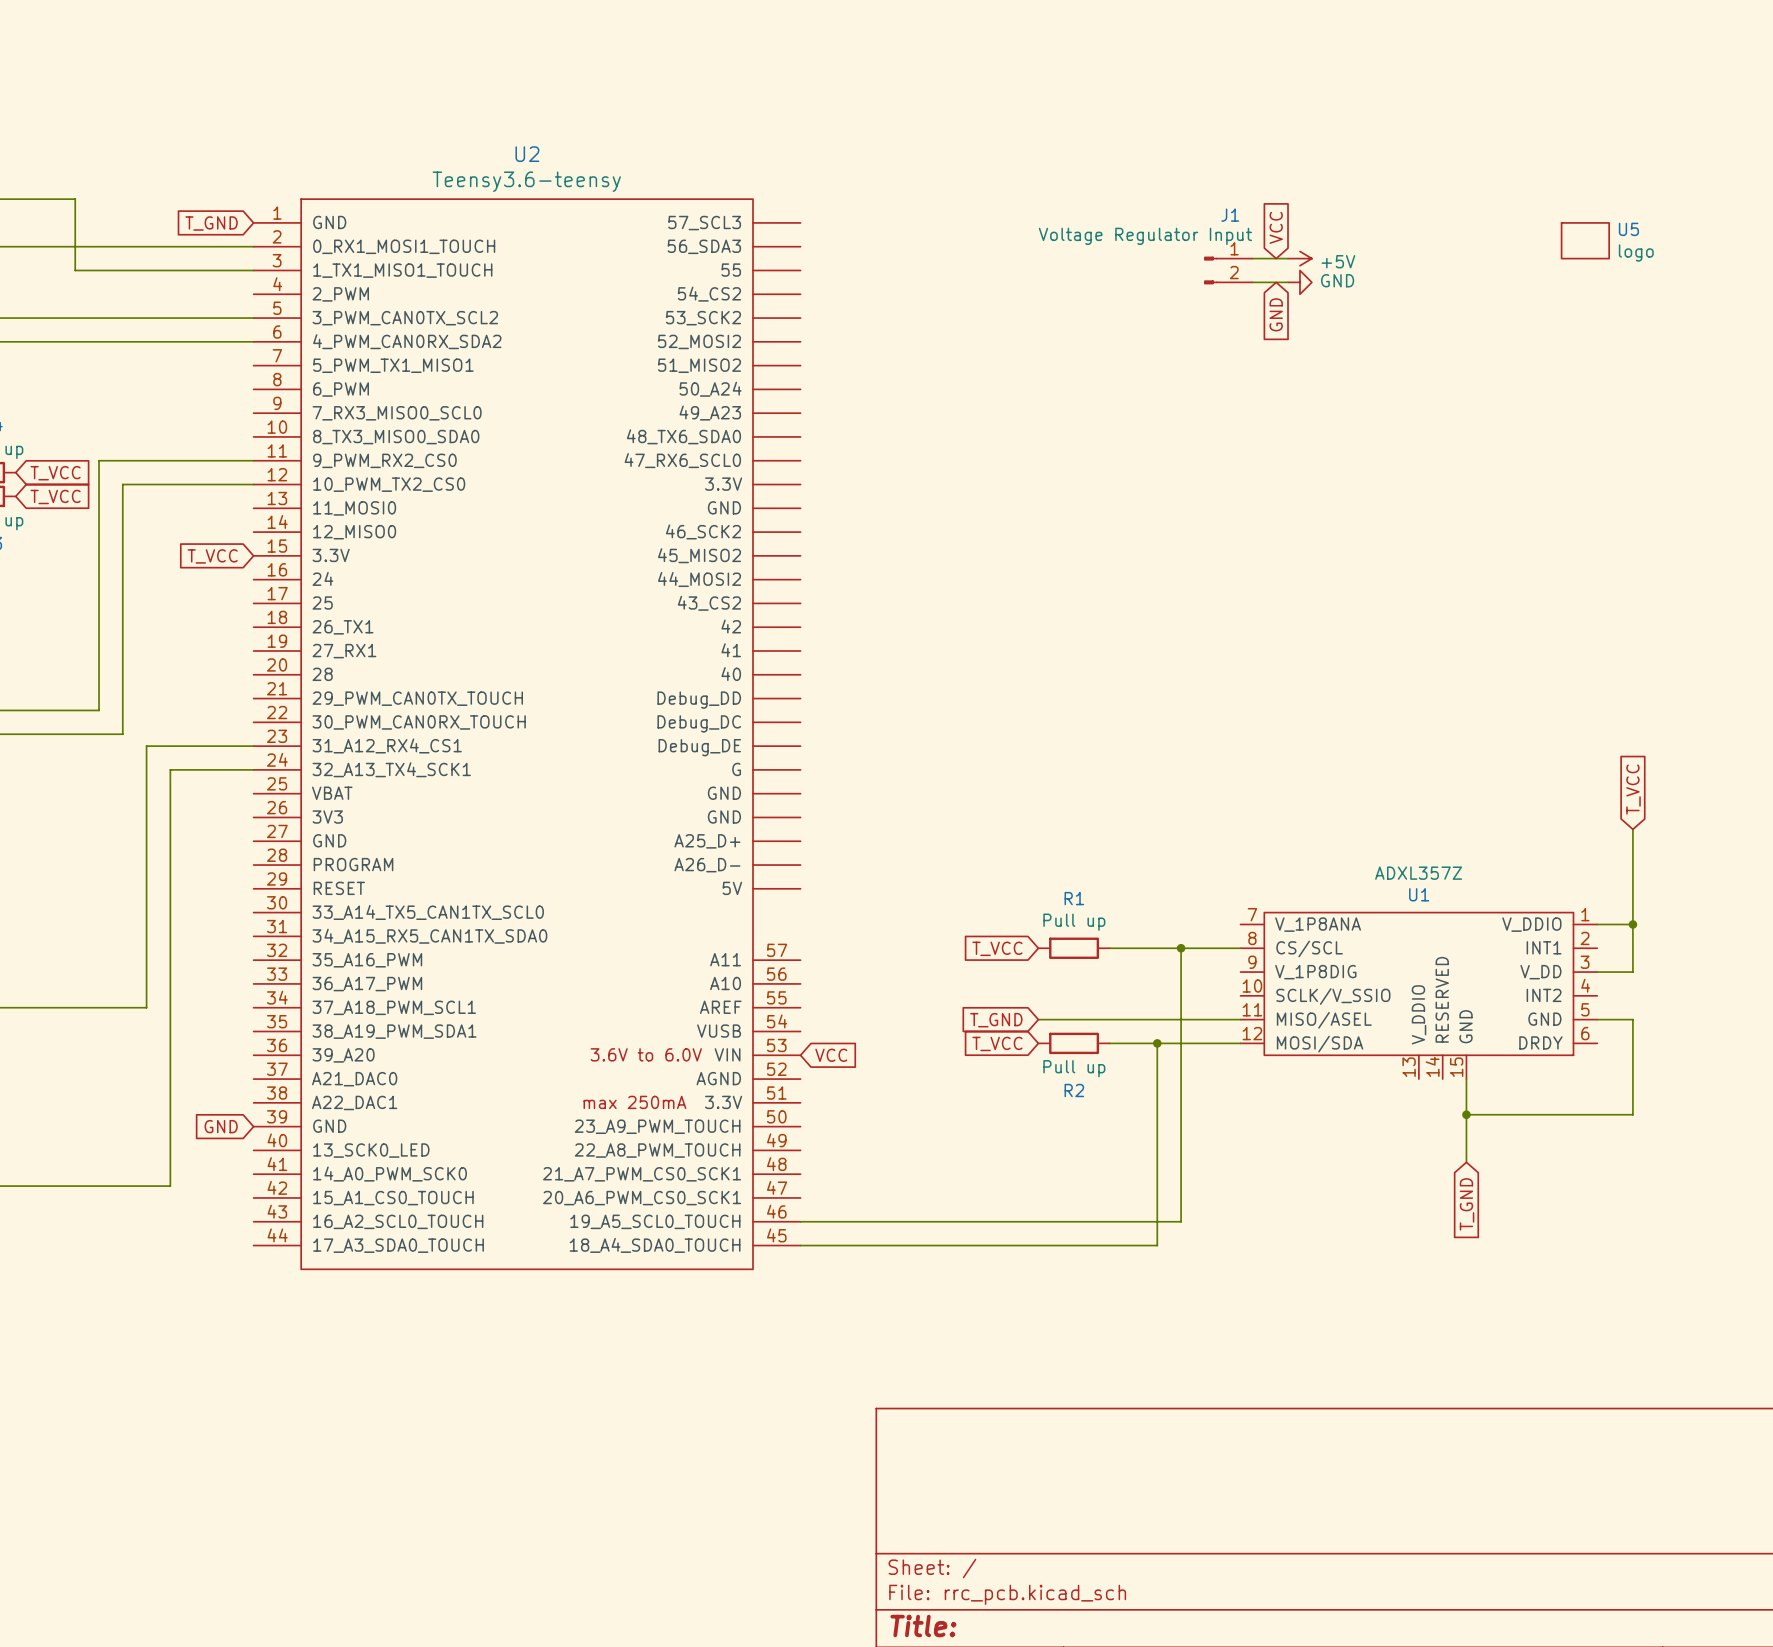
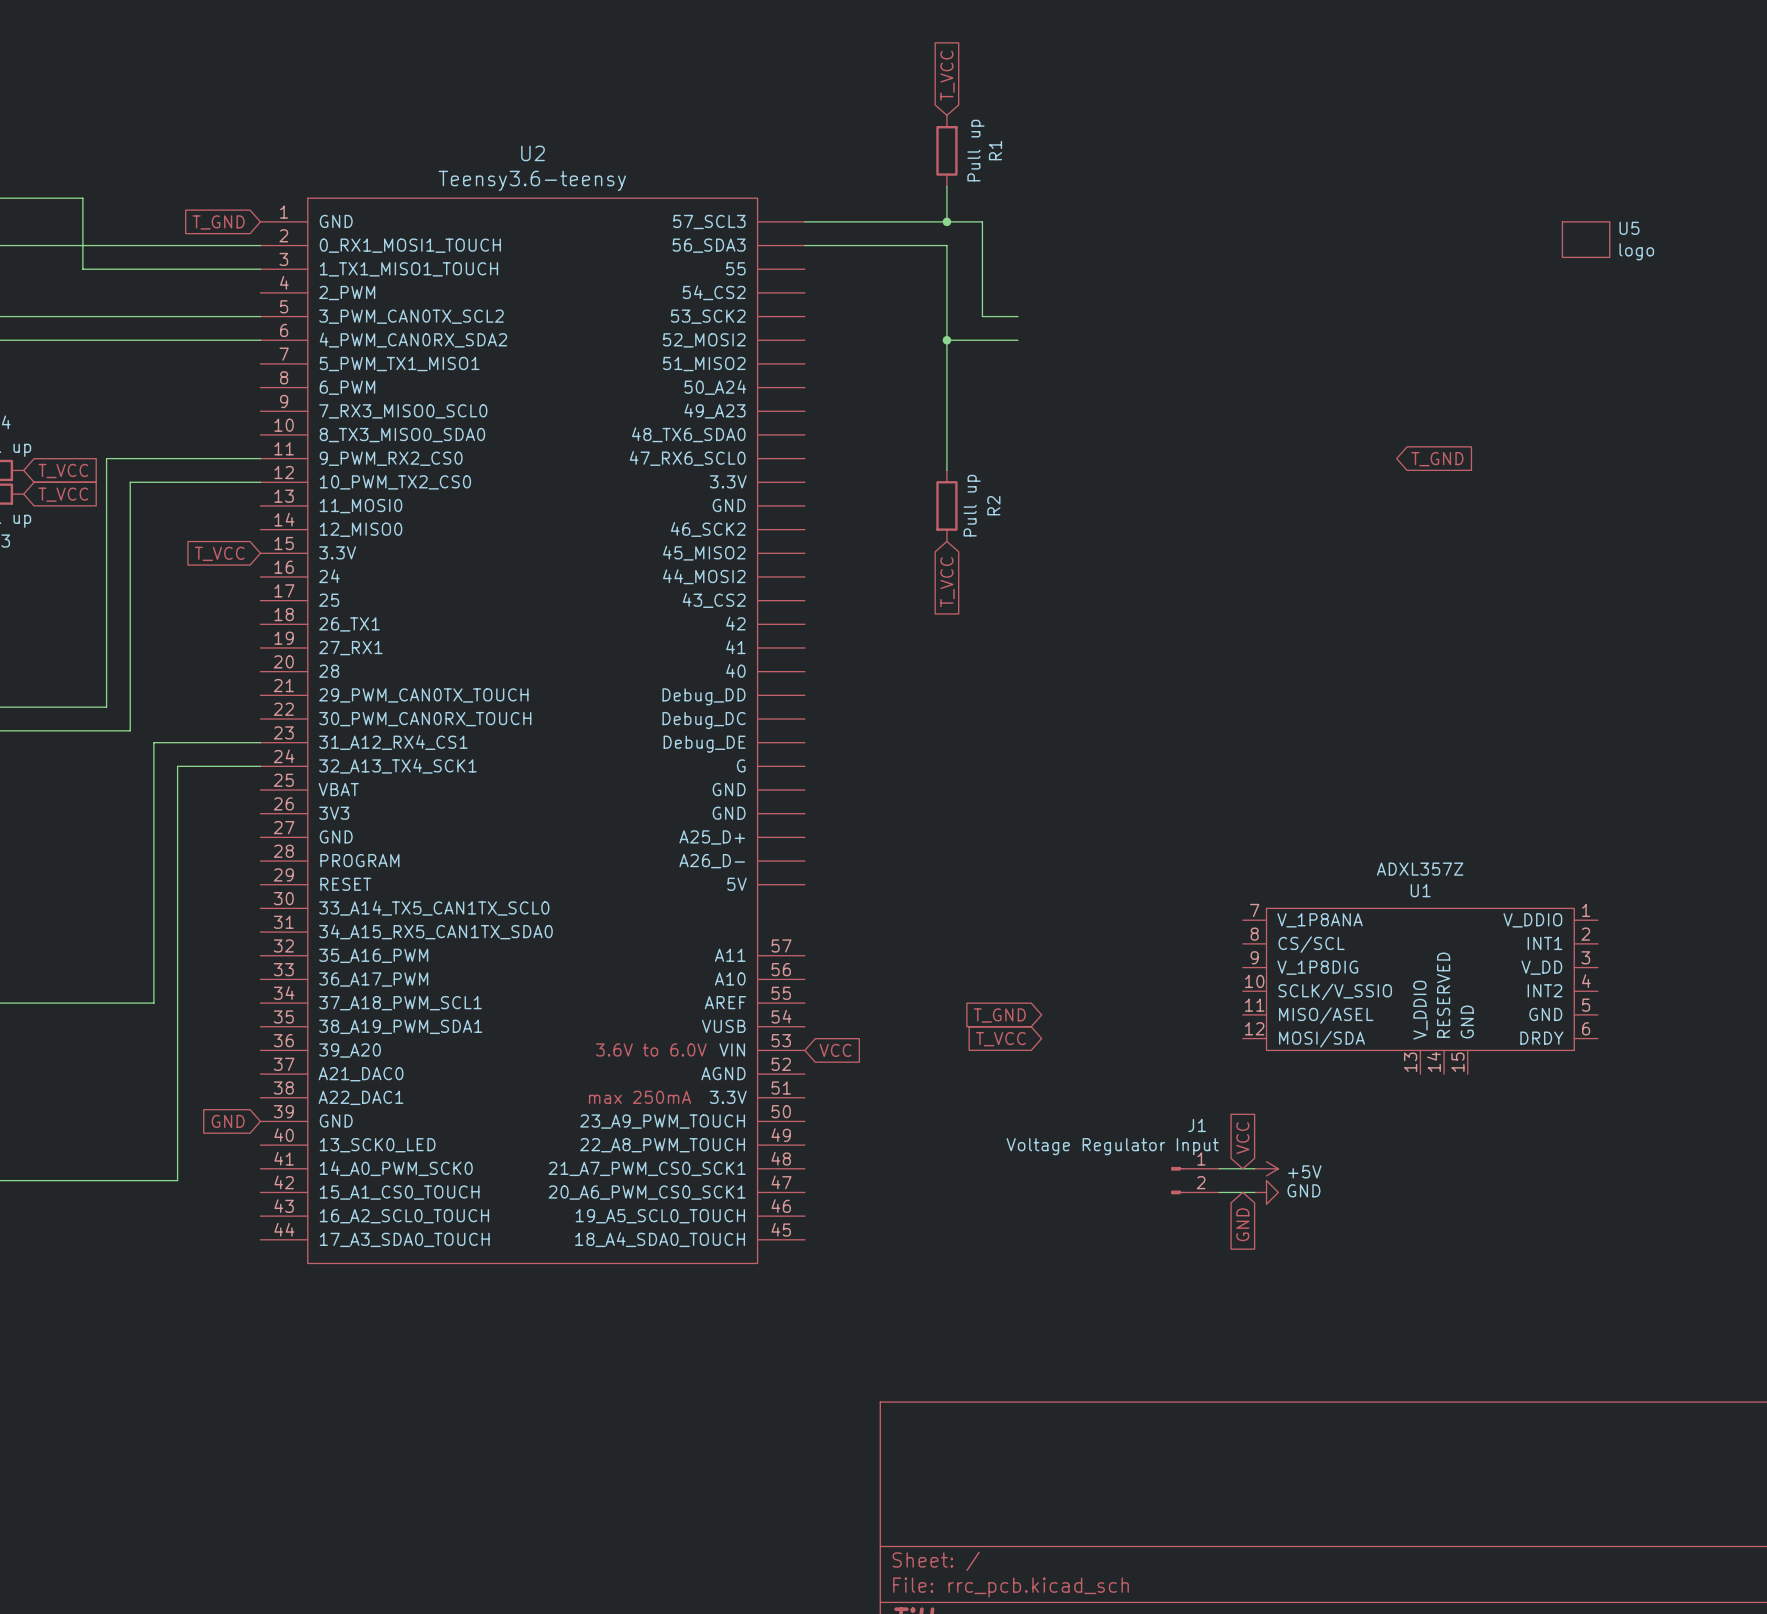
global label: none -> T_VCC (947, 75)
wire: none -> (946, 186) (946, 221)
wire: none -> (804, 221) (982, 221) (982, 316) (1017, 316)
junction: none -> (946, 221)
global label: VCC (1276, 227) -> none
wire: none -> (804, 245) (946, 245) (946, 470)
wire: (1252, 258) (1288, 258) -> none
power symbol: +5V (1299, 258) -> none
J1 position: (1228, 270) -> (1195, 1180)
wire: (1252, 282) (1288, 282) -> none
power symbol: GND (1299, 282) -> none
global label: GND (1276, 314) -> none
wire: none -> (946, 340) (1017, 340)
junction: none -> (946, 340)
global label: none -> T_GND (1437, 459)
global label: none -> T_VCC (947, 582)
global label: T_VCC (1633, 789) -> none
wire: (1632, 829) (1632, 972) (1597, 972) -> none
wire: (1597, 924) (1632, 924) -> none
junction: (1632, 924) -> none
global label: T_VCC (997, 948) -> none
R1 rotation: 0° (1074, 948) -> 90° clockwise (946, 150)
R1 position: (1074, 948) -> (946, 150)
wire: (1109, 948) (1240, 948) -> none
wire: (1181, 948) (1181, 1221) (800, 1221) -> none
junction: (1181, 948) -> none
wire: (1038, 1019) (1240, 1019) -> none
wire: (1597, 1019) (1632, 1019) (1632, 1114) (1466, 1114) -> none
R2 rotation: 0° (1074, 1043) -> 90° clockwise (946, 505)
R2 position: (1074, 1043) -> (946, 505)
wire: (1109, 1043) (1240, 1043) -> none
wire: (1157, 1043) (1157, 1245) (800, 1245) -> none
junction: (1157, 1043) -> none
R2 value position: Pull up (1074, 1068) -> Pull up (972, 505)
wire: (1466, 1079) (1466, 1162) -> none
R2 name position: R2 (1074, 1090) -> R2 (993, 505)
junction: (1466, 1114) -> none
global label: none -> VCC (1242, 1138)
wire: none -> (1219, 1168) (1254, 1168)
power symbol: none -> +5V (1266, 1168)
wire: none -> (1219, 1192) (1254, 1192)
power symbol: none -> GND (1266, 1192)
global label: T_GND (1467, 1204) -> none
global label: none -> GND (1242, 1224)

